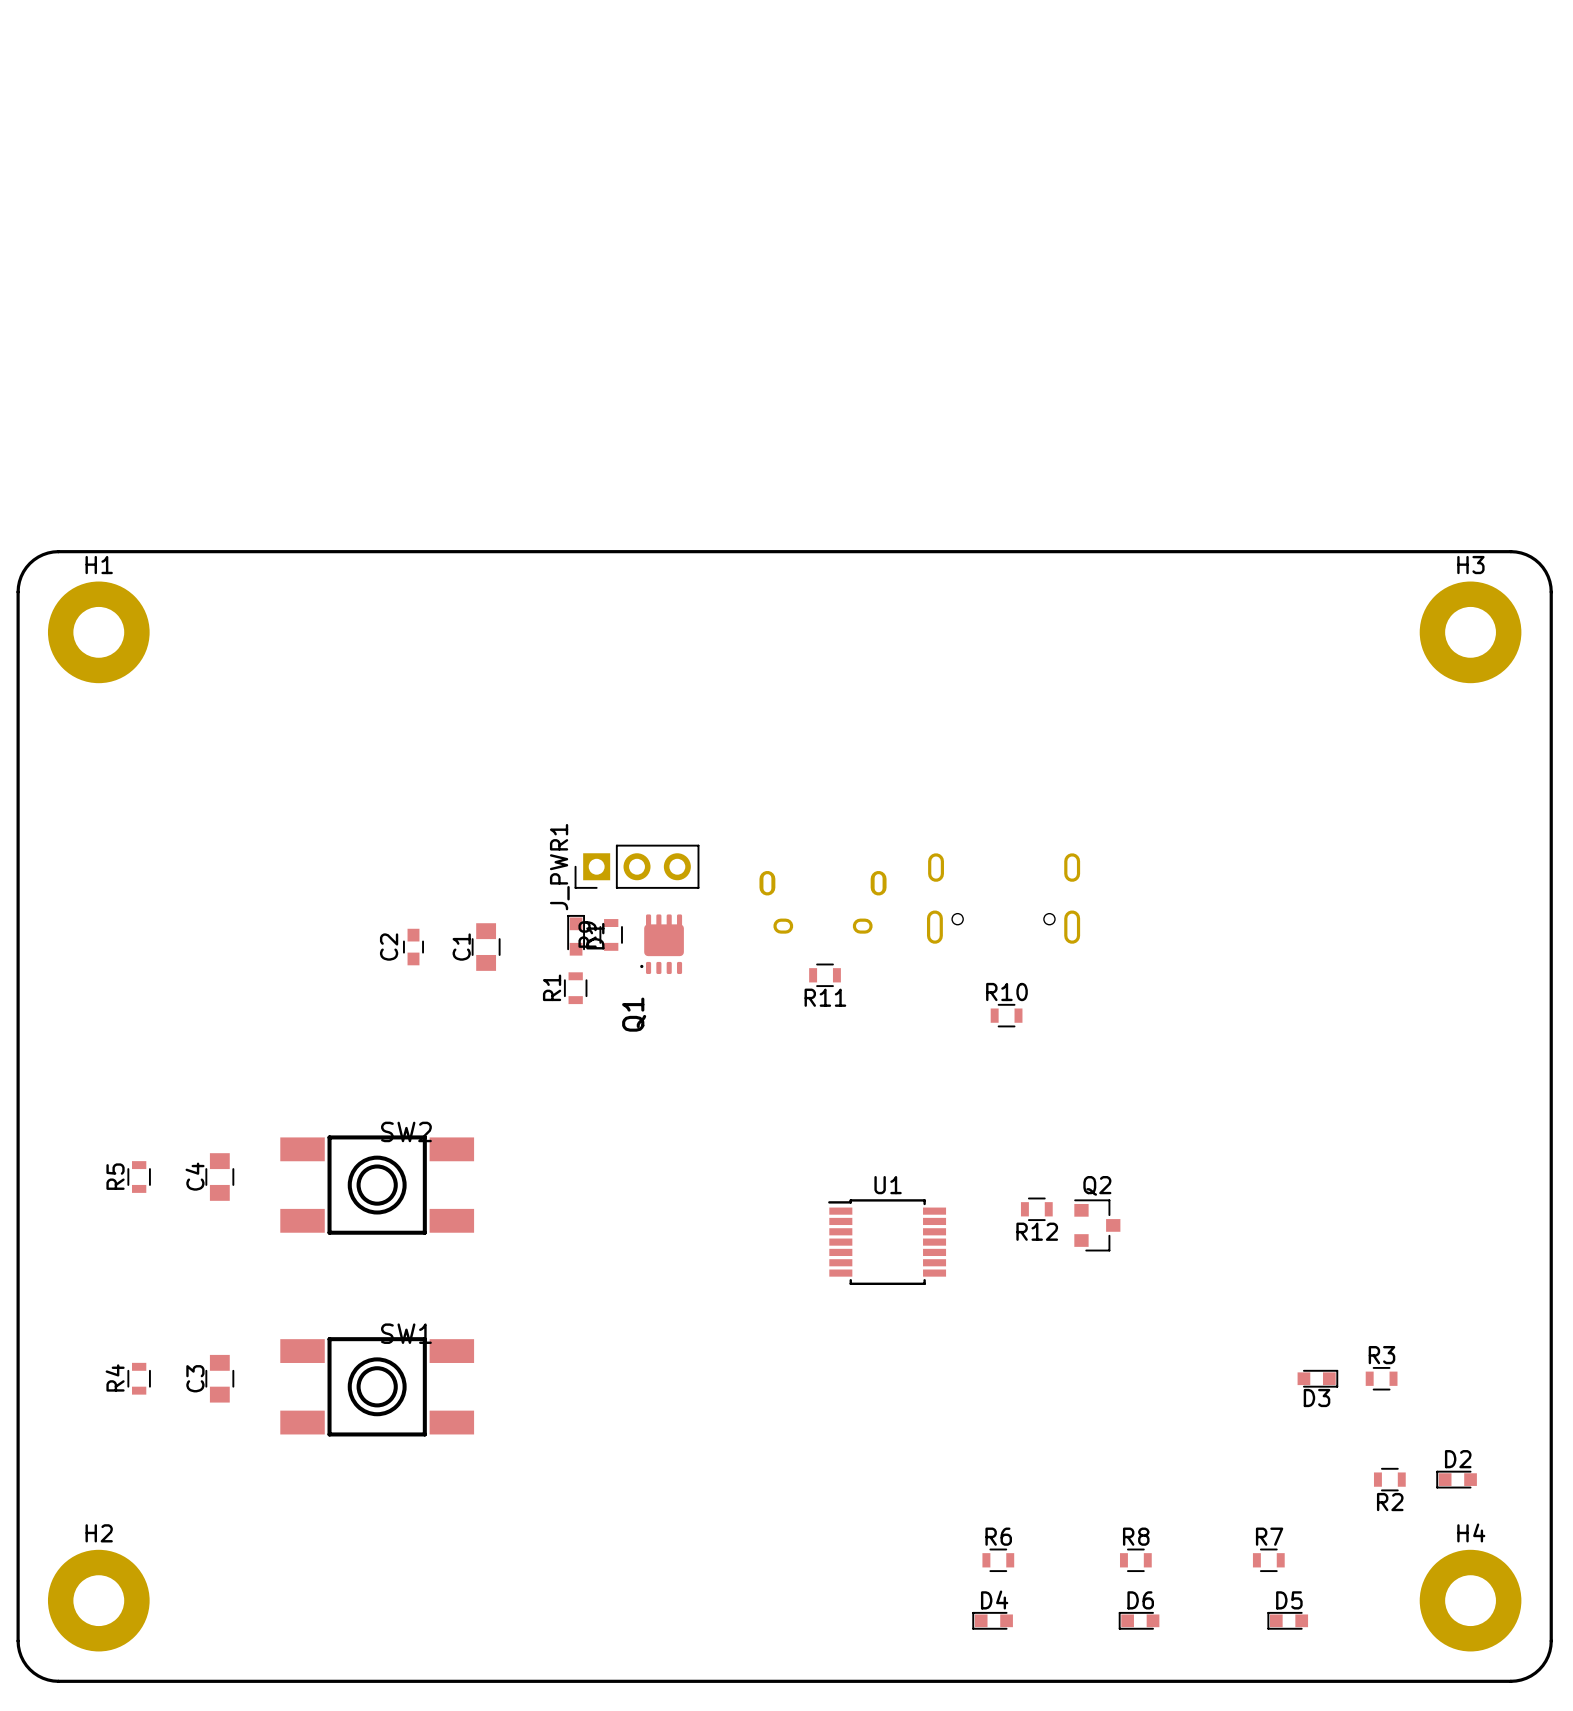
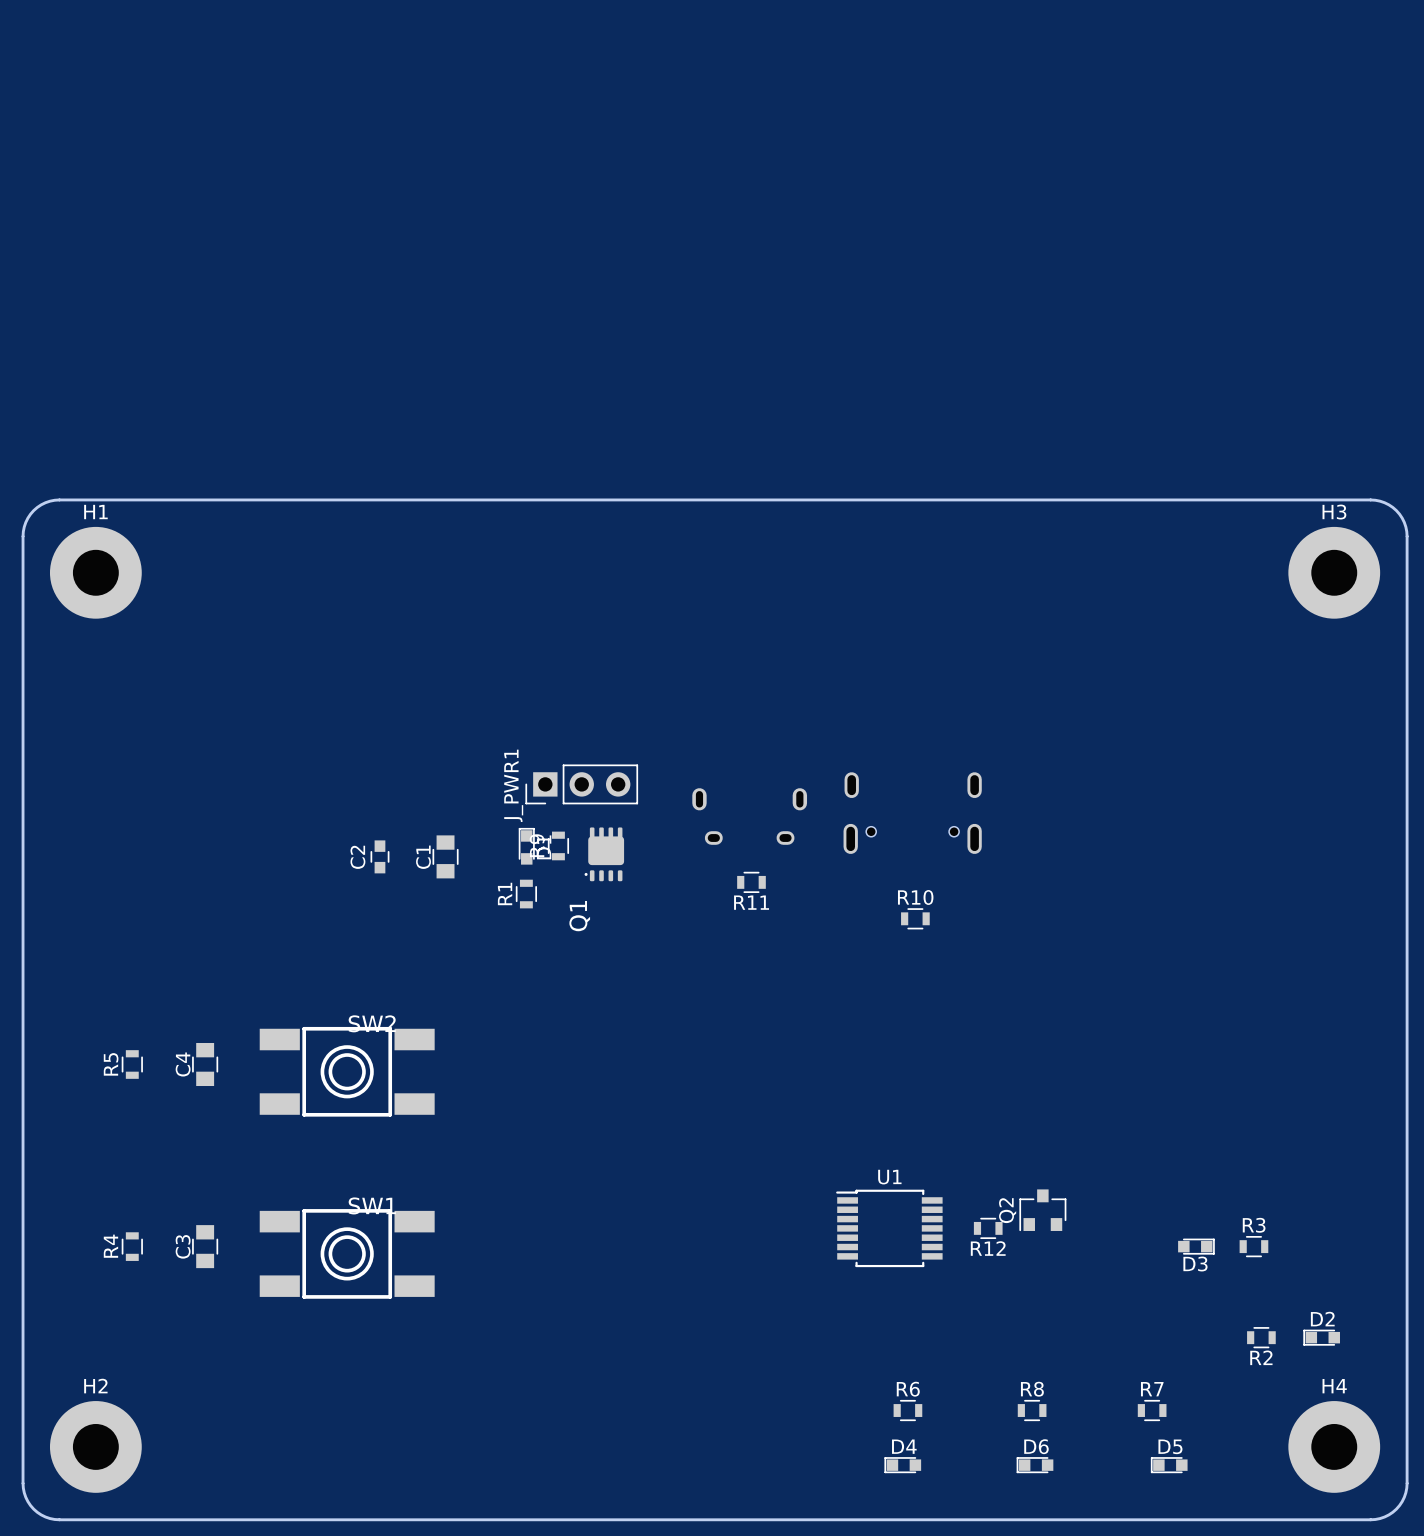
R12 position: (1036, 1209) -> (988, 1228)
Q2 rotation: 0° (1097, 1225) -> 90° counterclockwise (1042, 1210)
Q2 position: (1097, 1225) -> (1042, 1210)
U1 position: (887, 1242) -> (889, 1228)

